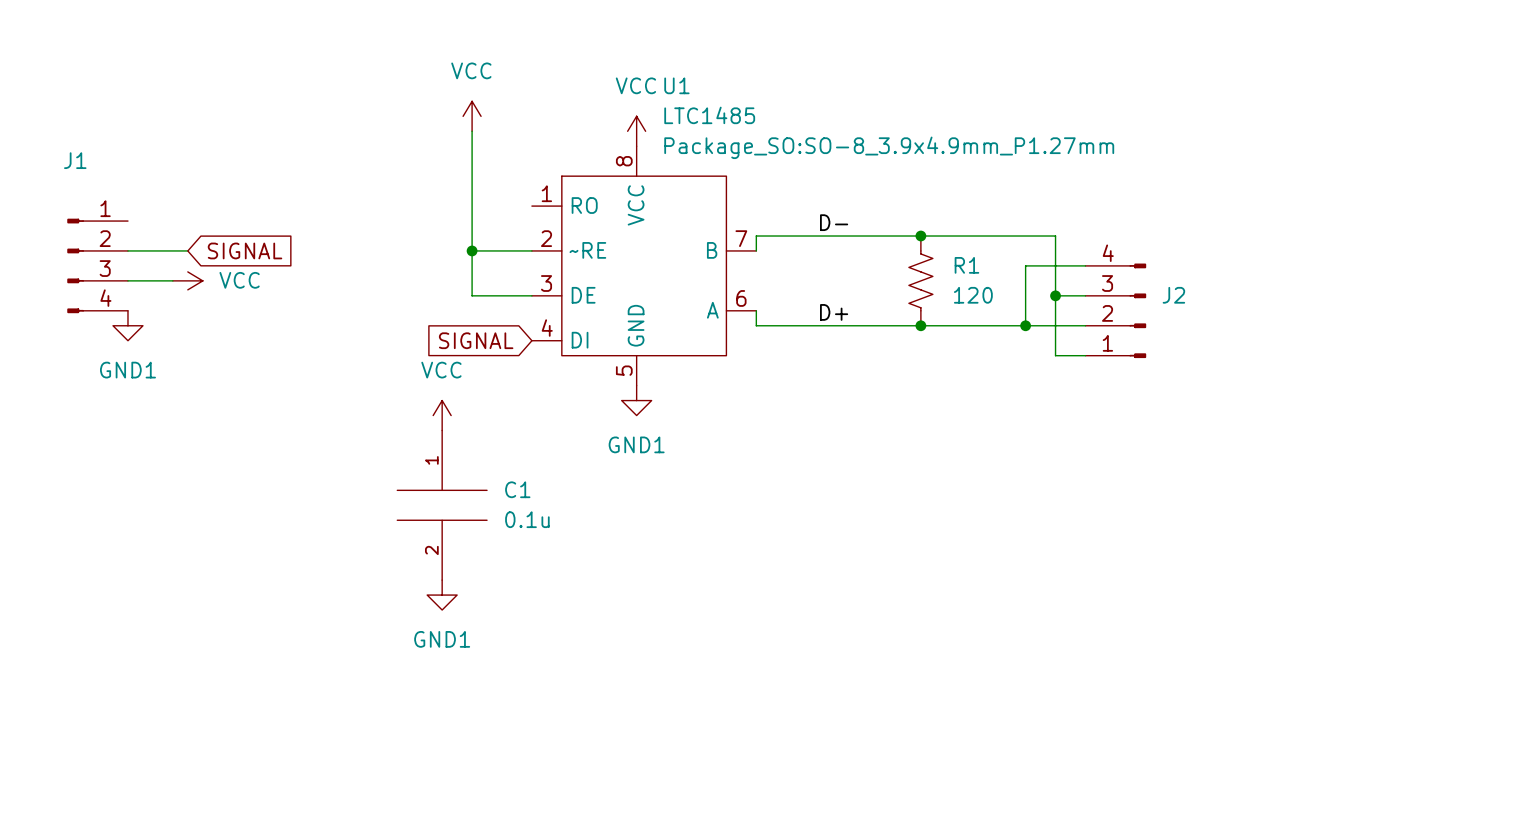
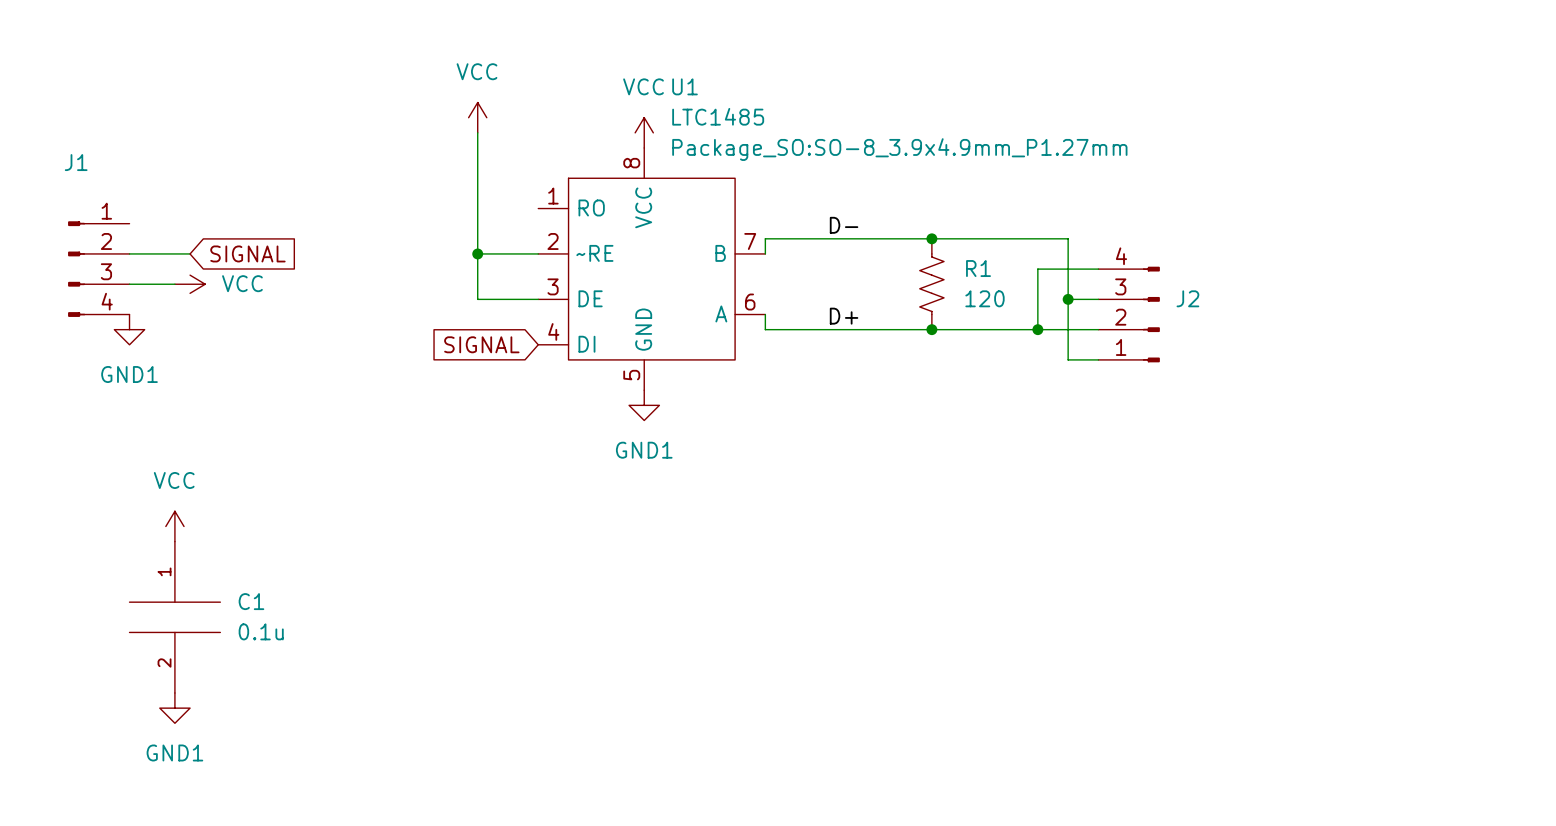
power symbol position: VCC (442, 415) -> VCC (174, 526)
C1 position: (442, 505) -> (174, 617)
power symbol position: GND1 (442, 595) -> GND1 (174, 708)

